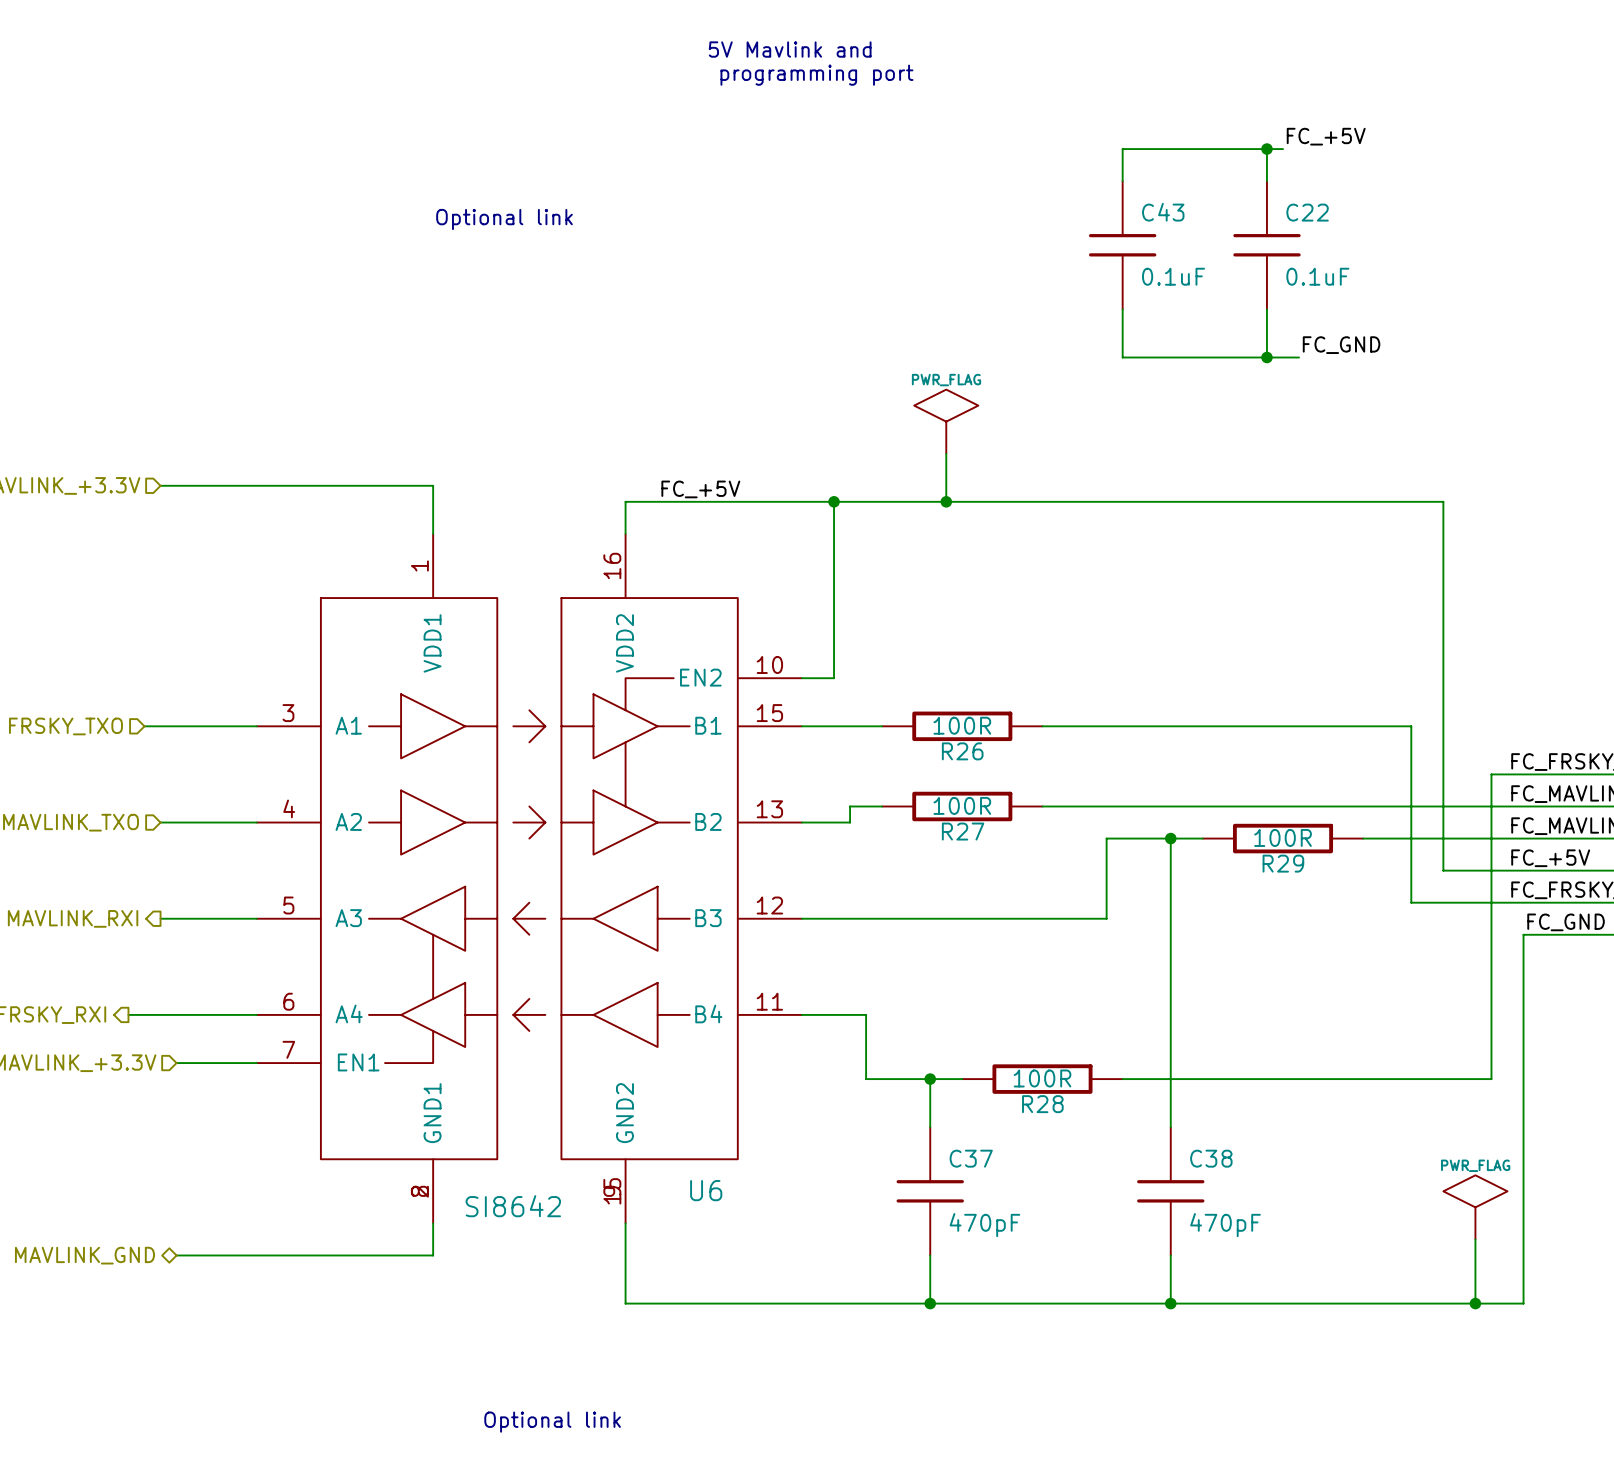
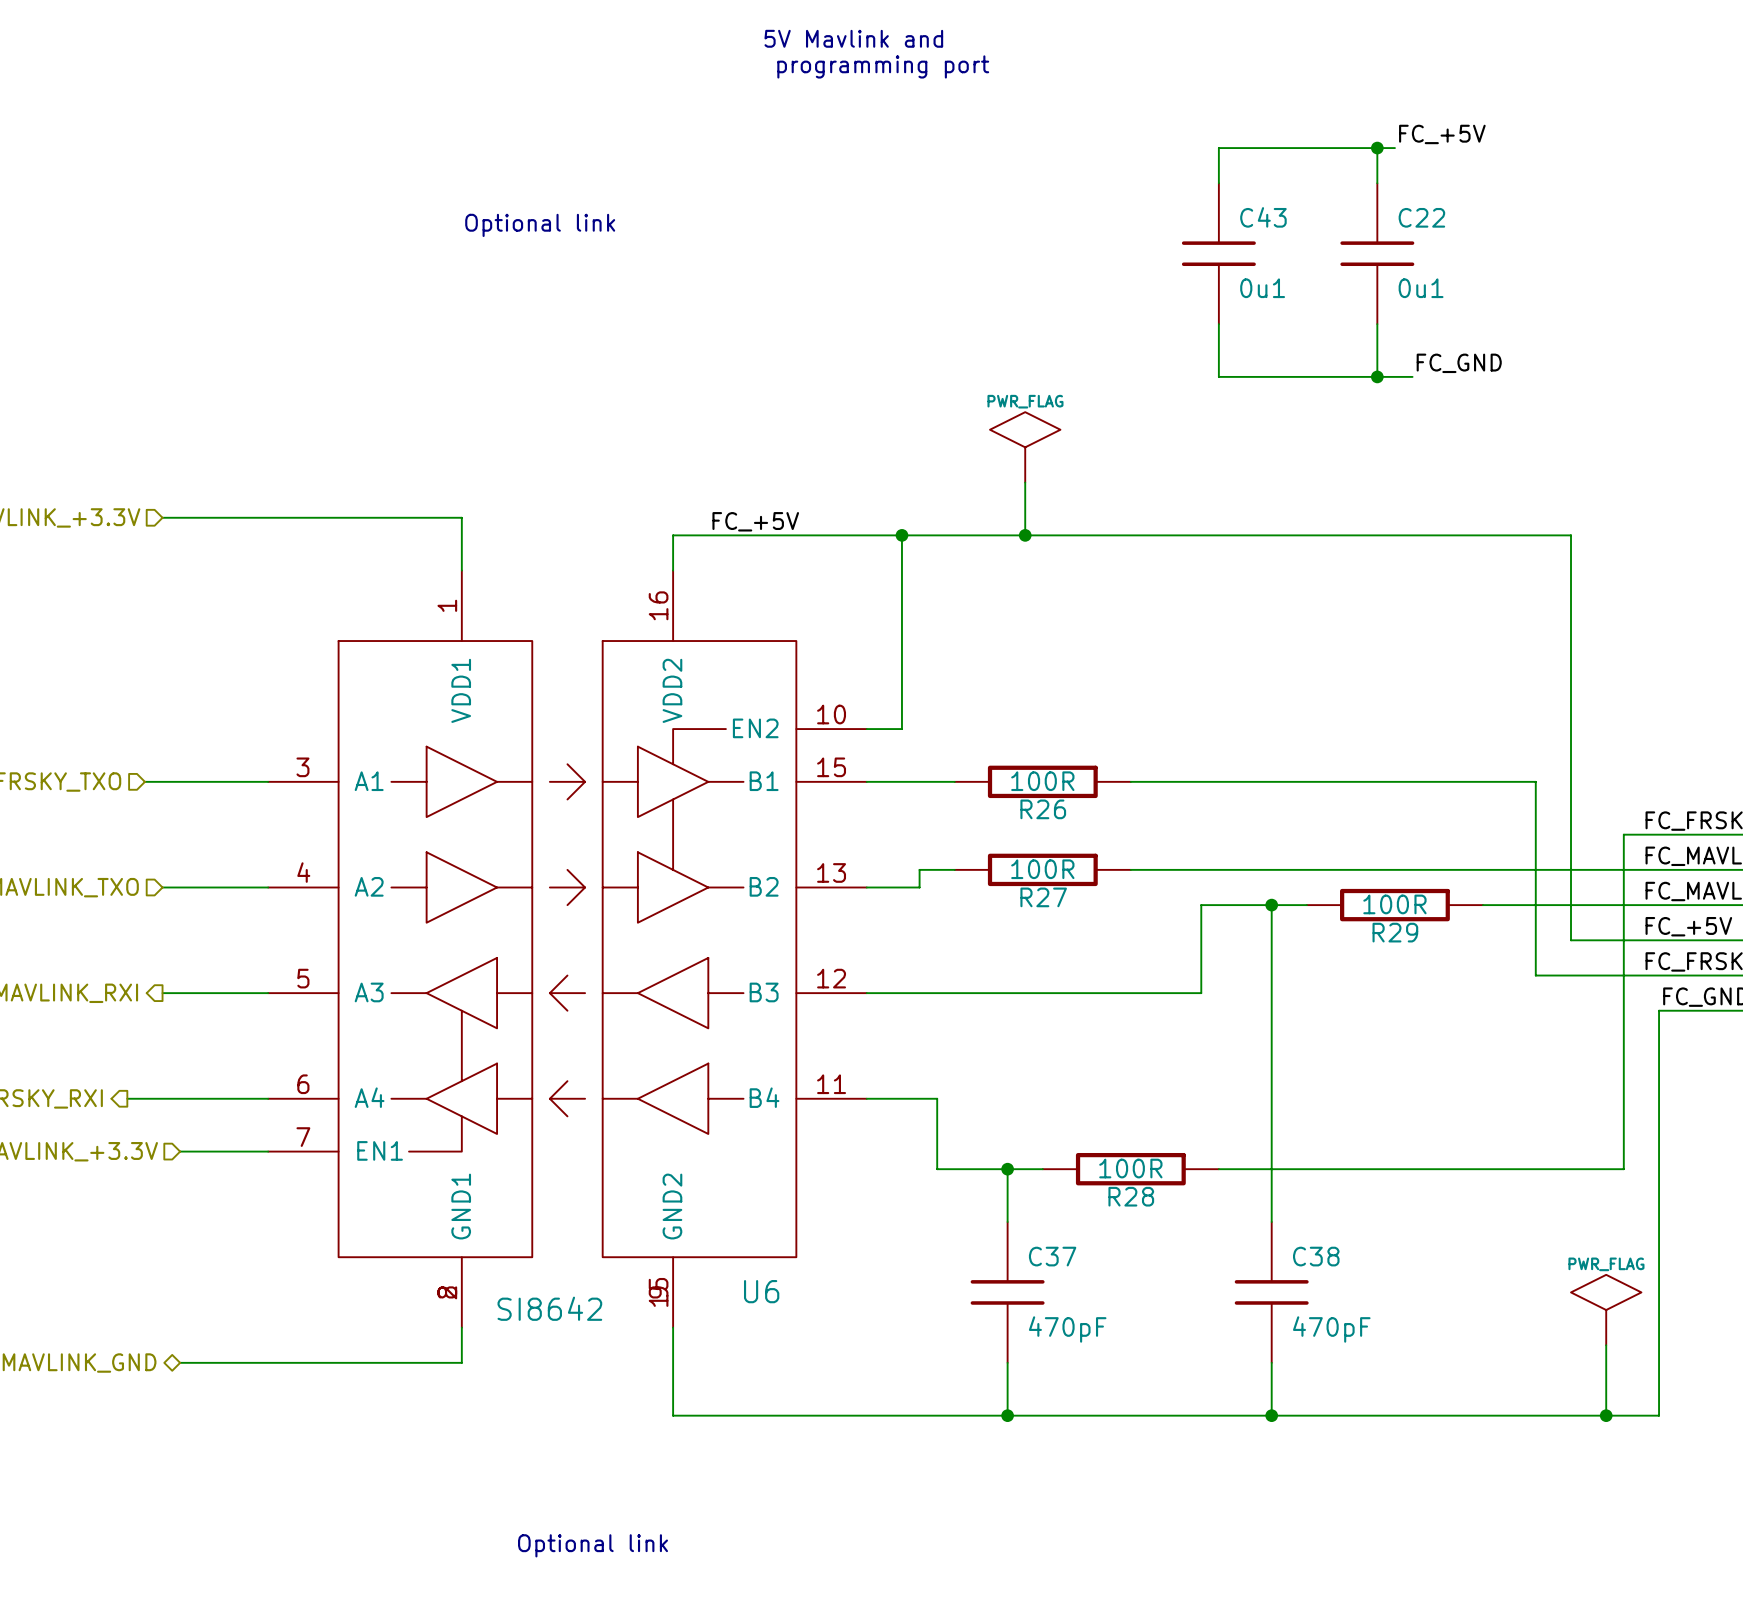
C43 value: 0.1uF (1173, 276) -> 0u1 (1262, 288)
C22 value: 0.1uF (1317, 276) -> 0u1 (1421, 288)

